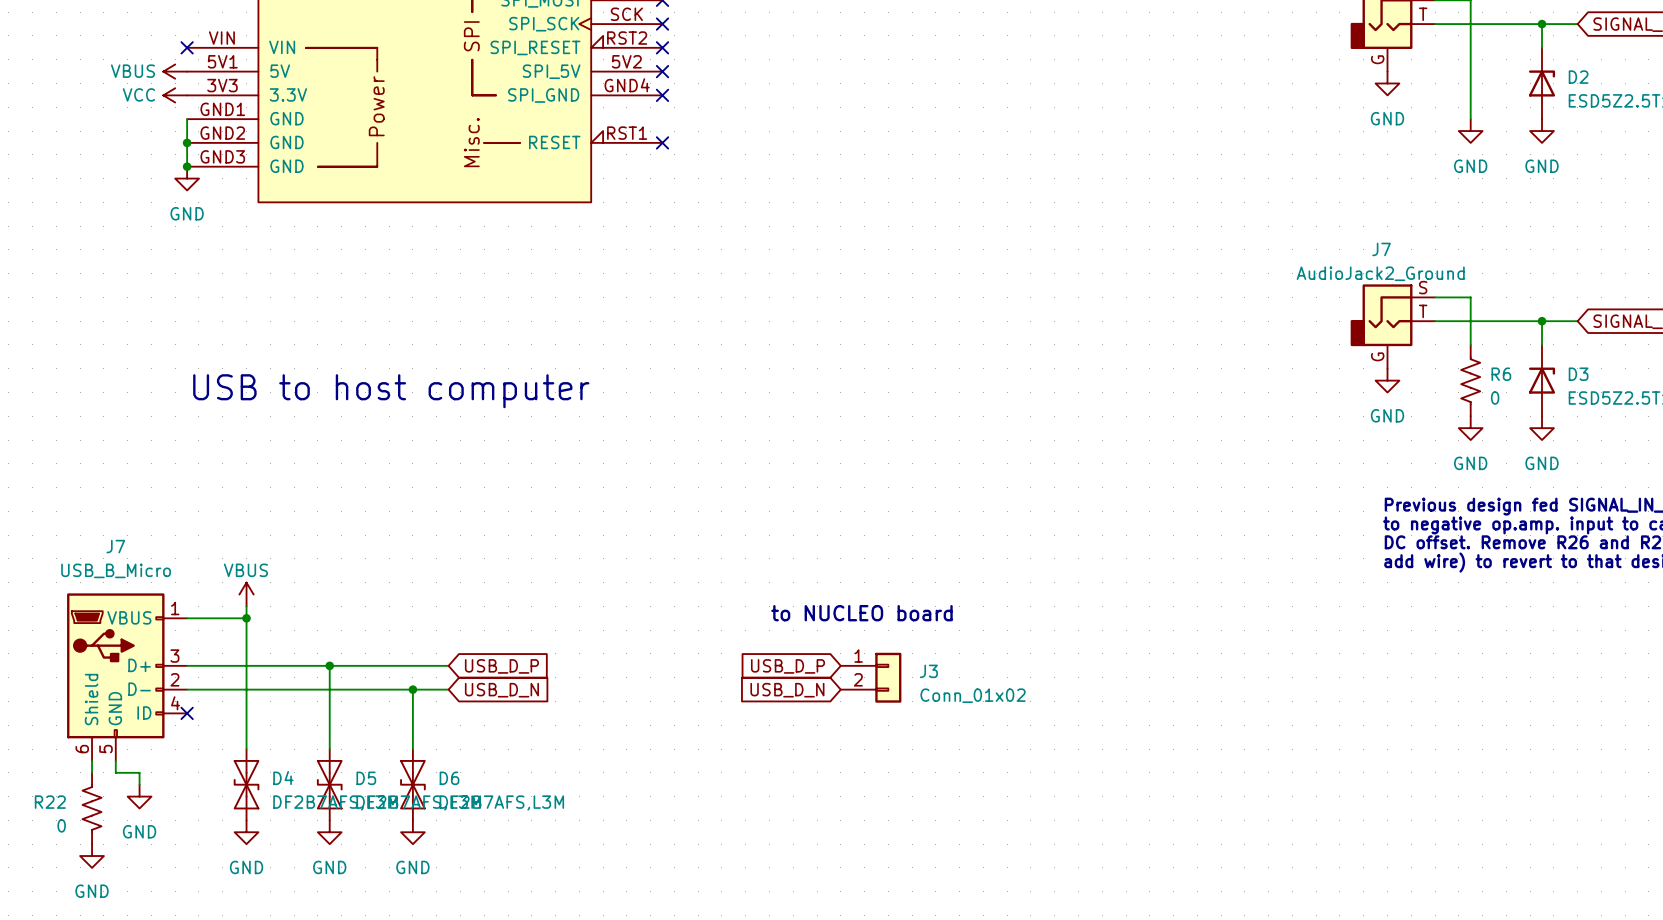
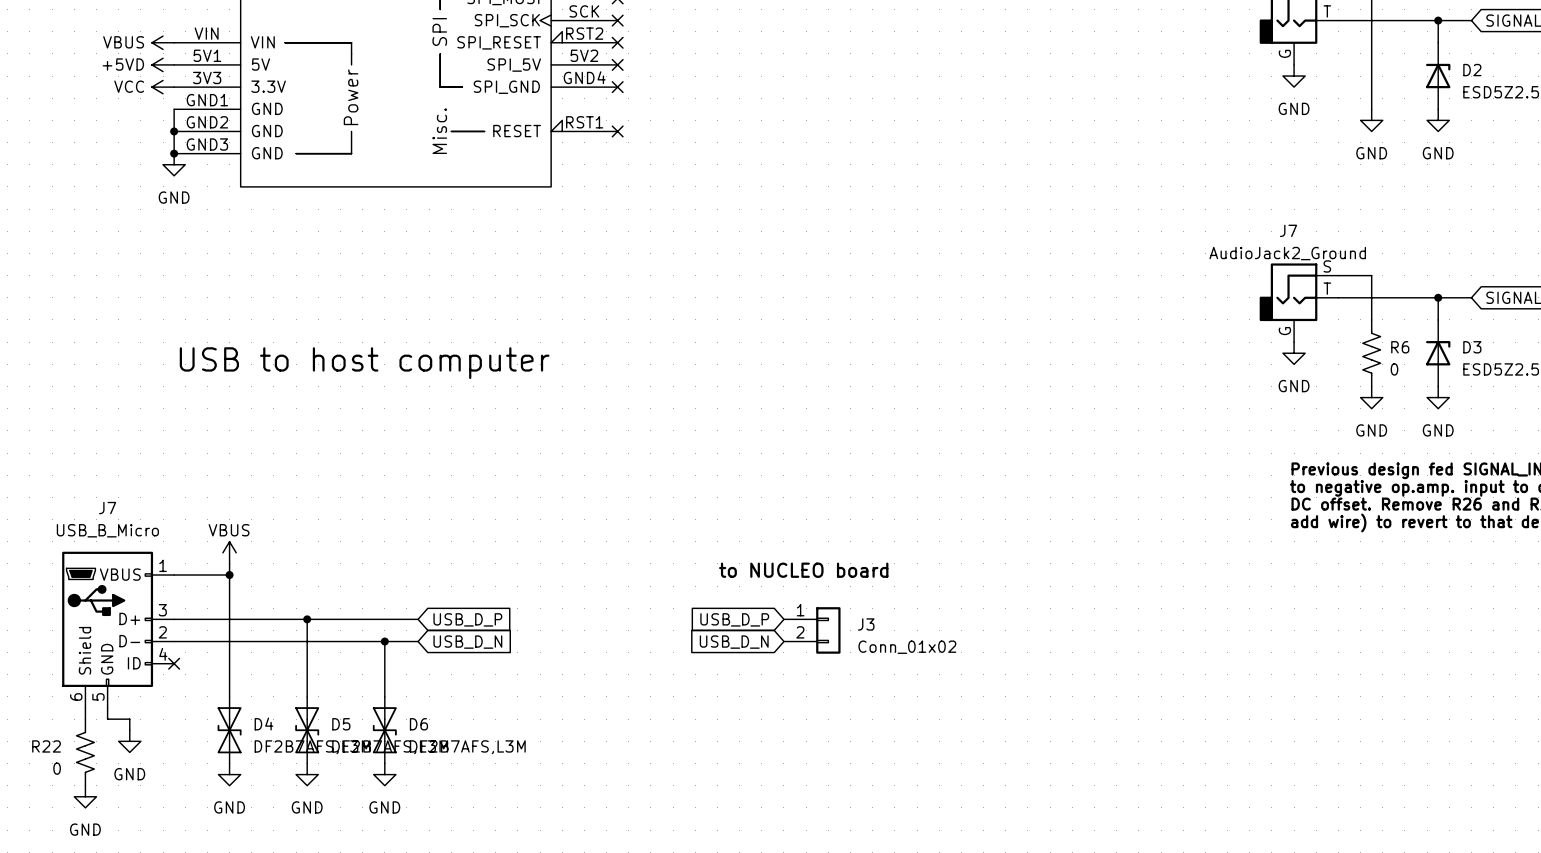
power symbol: none -> VBUS (163, 42)
no-connect mark: (187, 47) -> none
power symbol: VBUS (175, 71) -> +5VD (163, 64)

